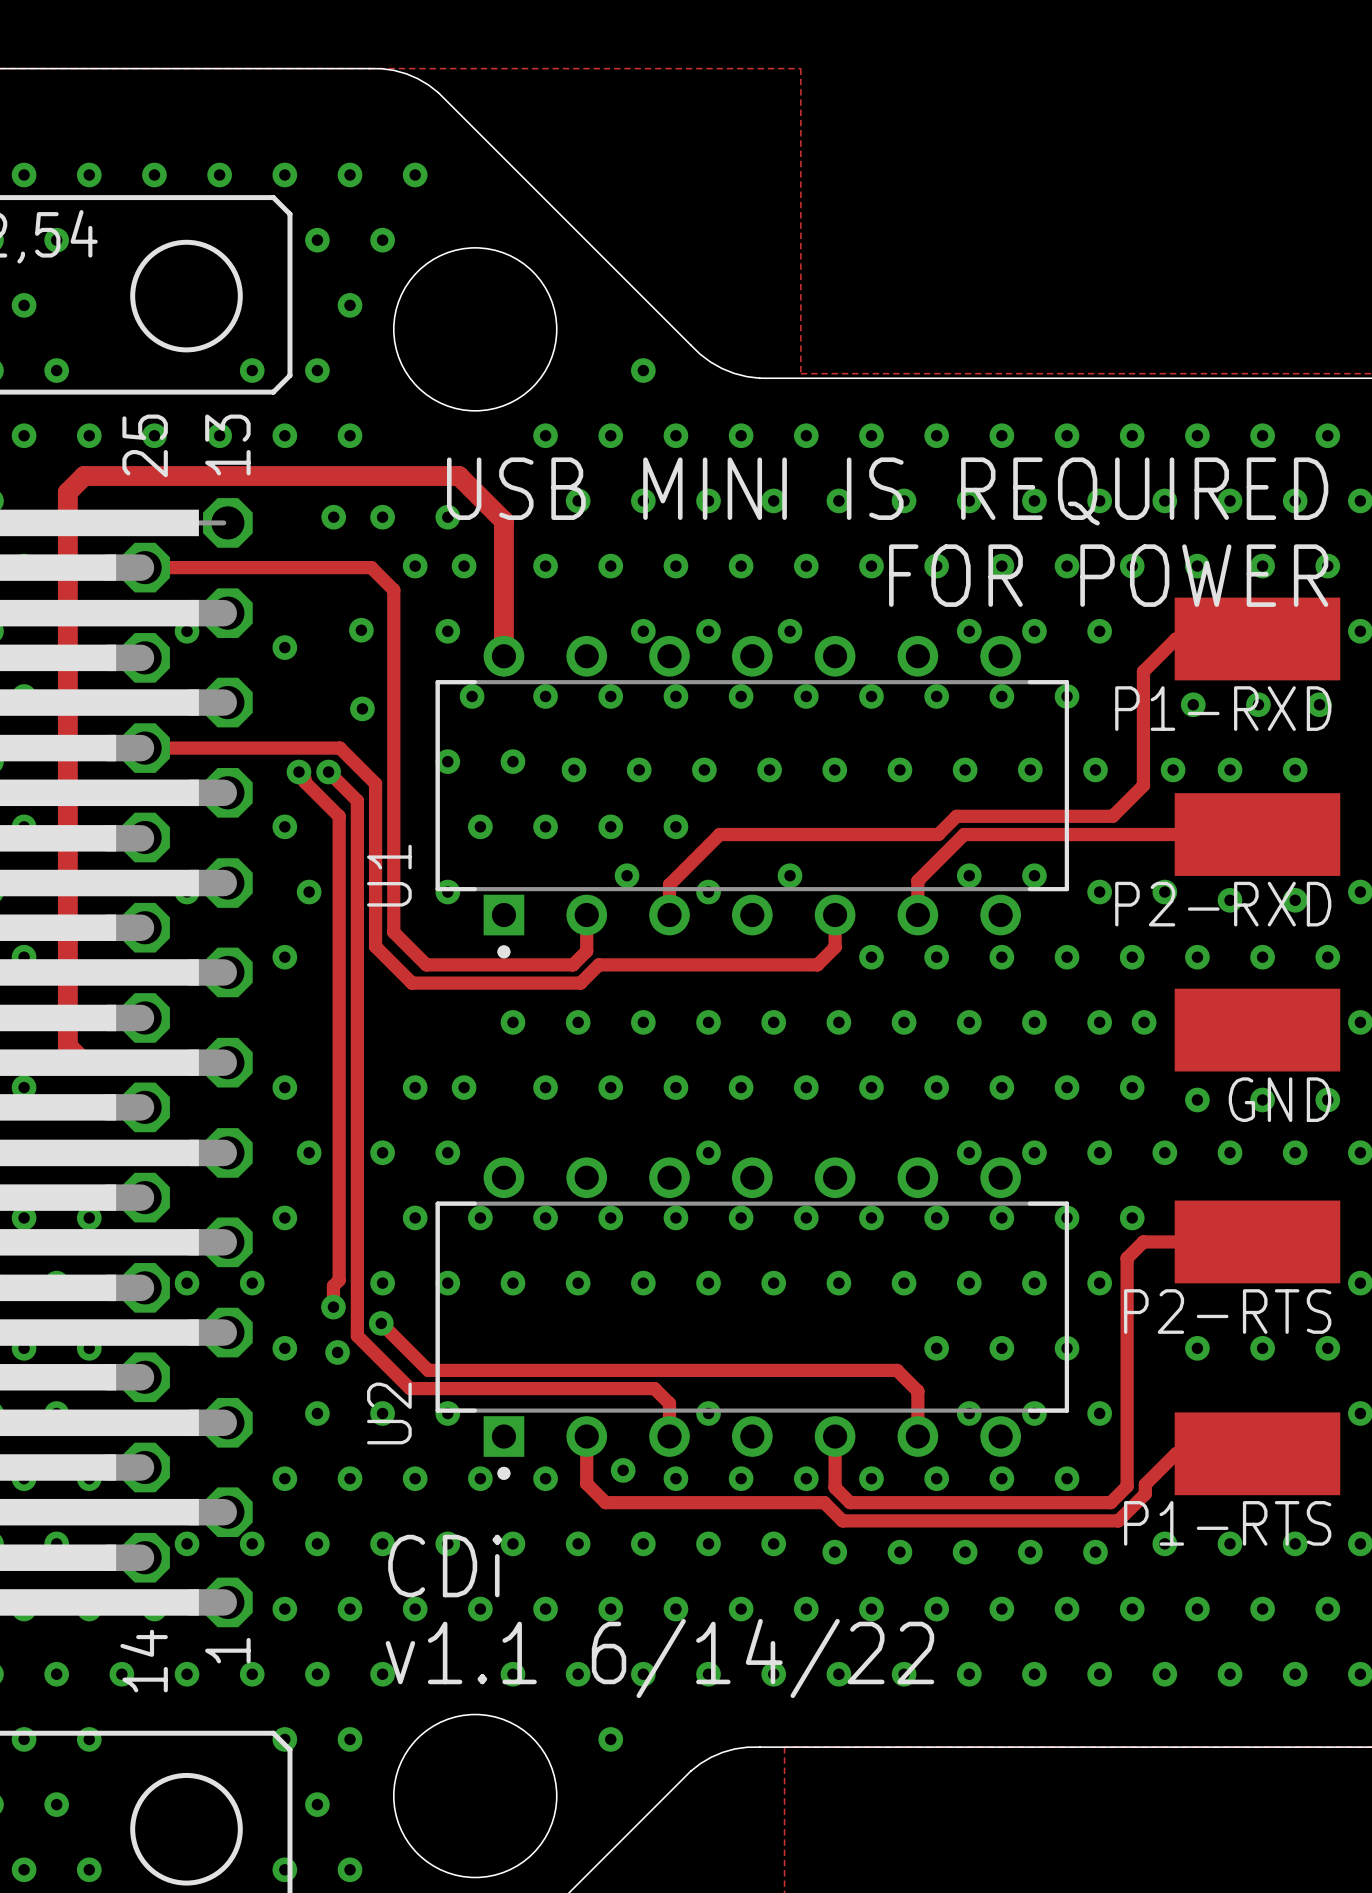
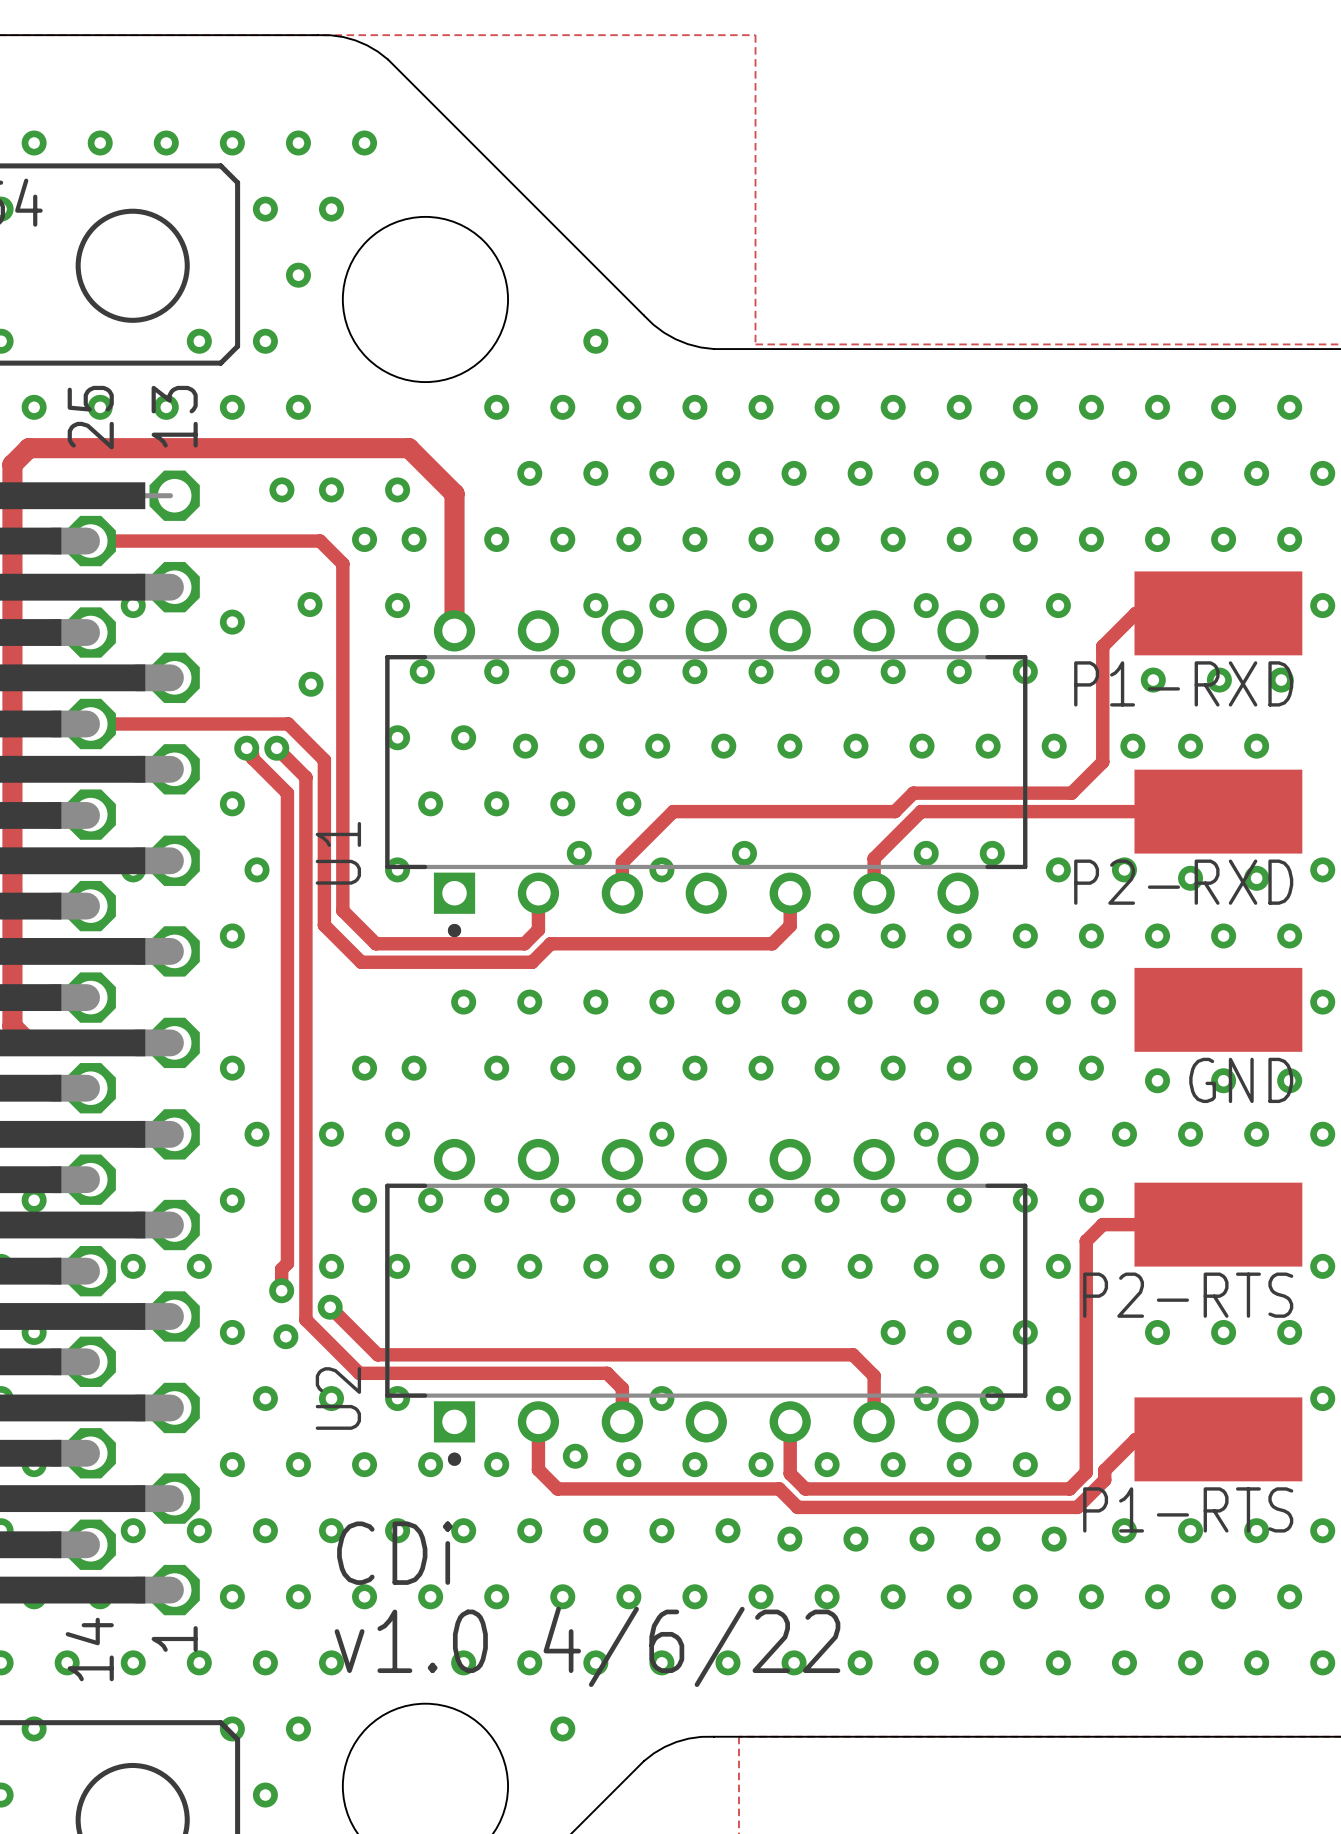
text: USB MINI IS REQUIRED (887, 491) -> none
text: FOR POWER (1108, 575) -> none
text: v1.1 6/14/22 (659, 1658) -> v1.0 4/6/22 (587, 1646)

